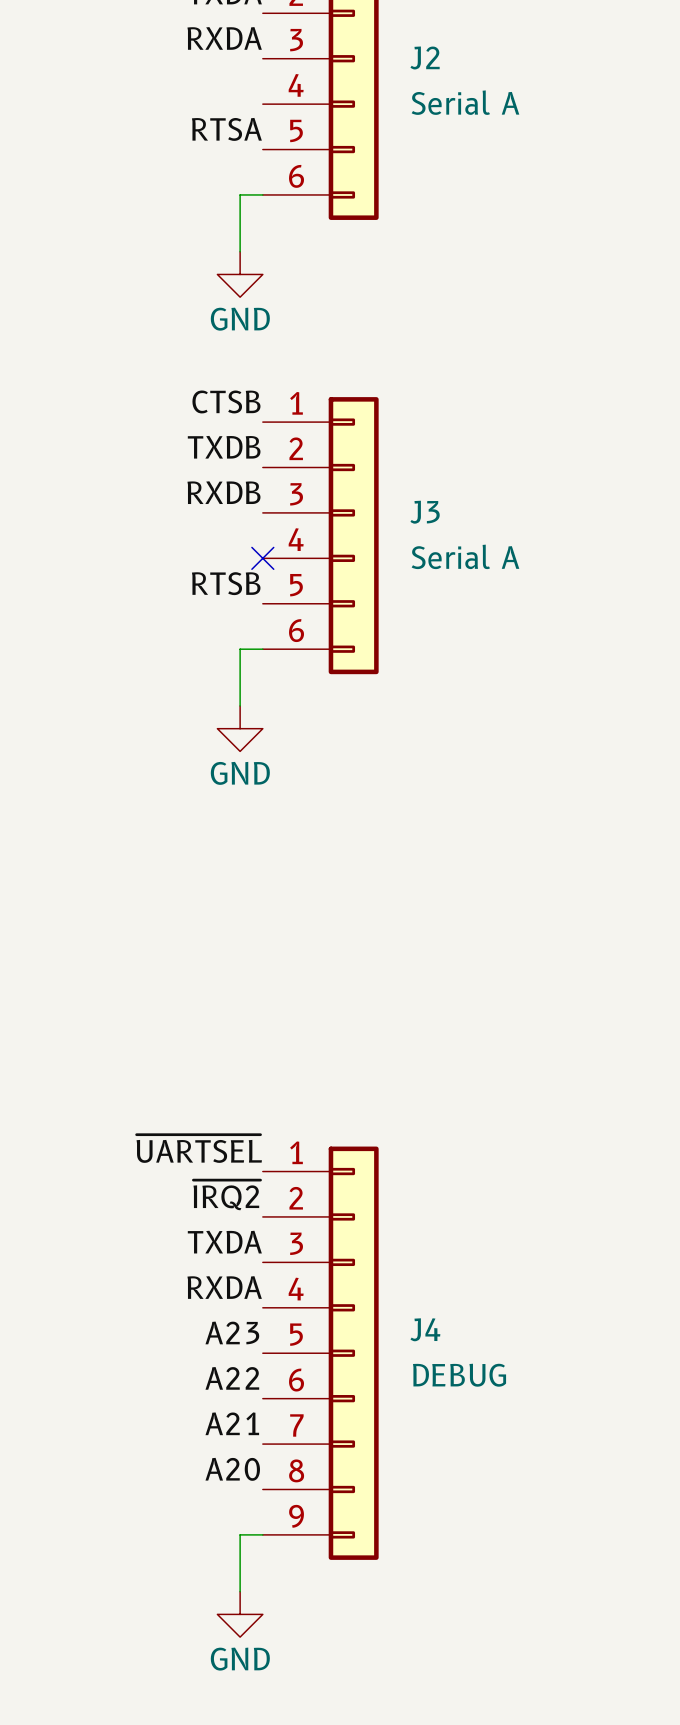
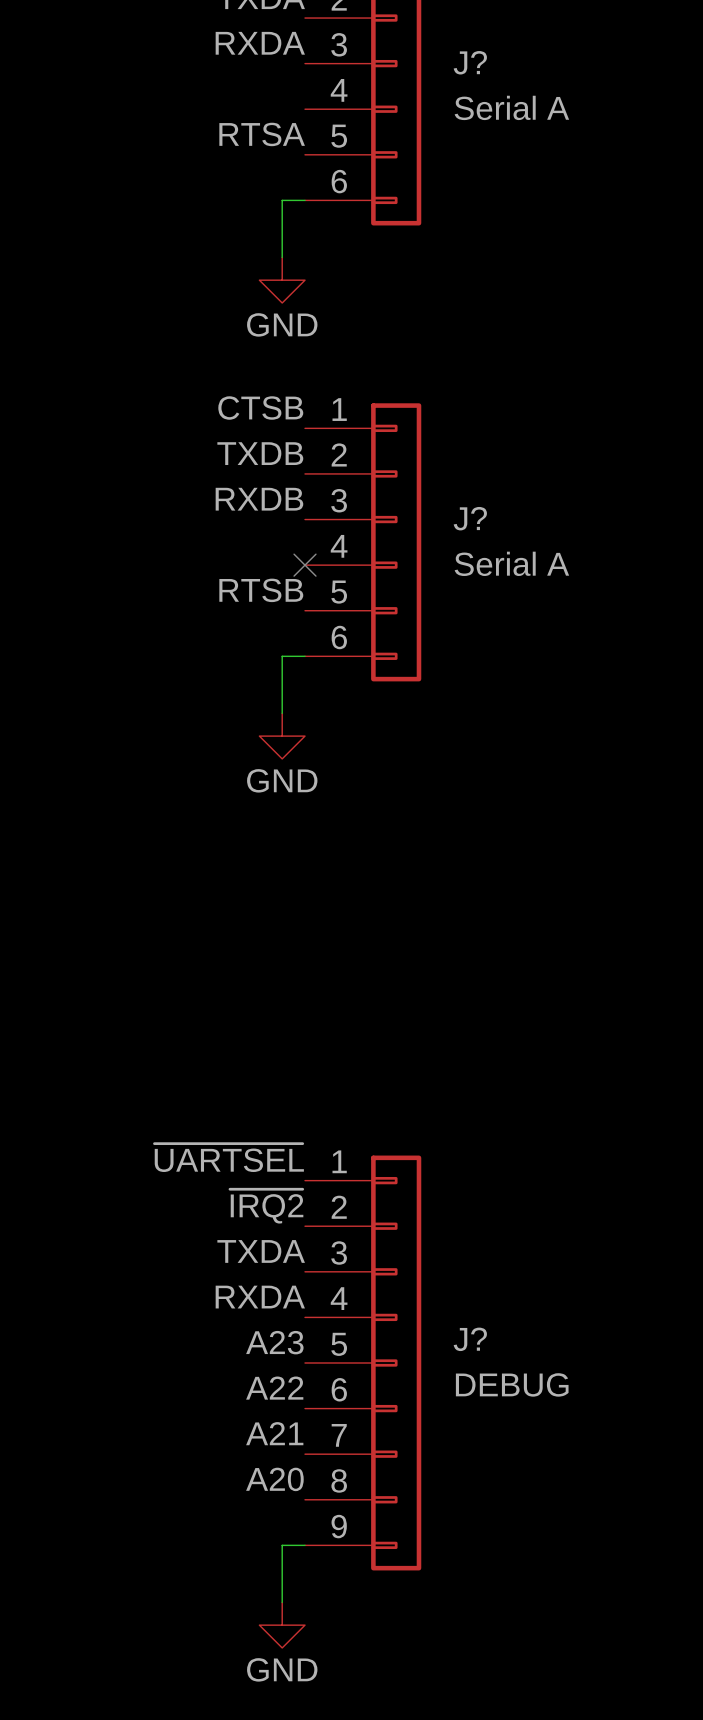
J2 name: J2 (425, 57) -> J? (470, 62)
J3 name: J3 (425, 512) -> J? (470, 518)
J4 name: J4 (425, 1329) -> J? (470, 1339)

